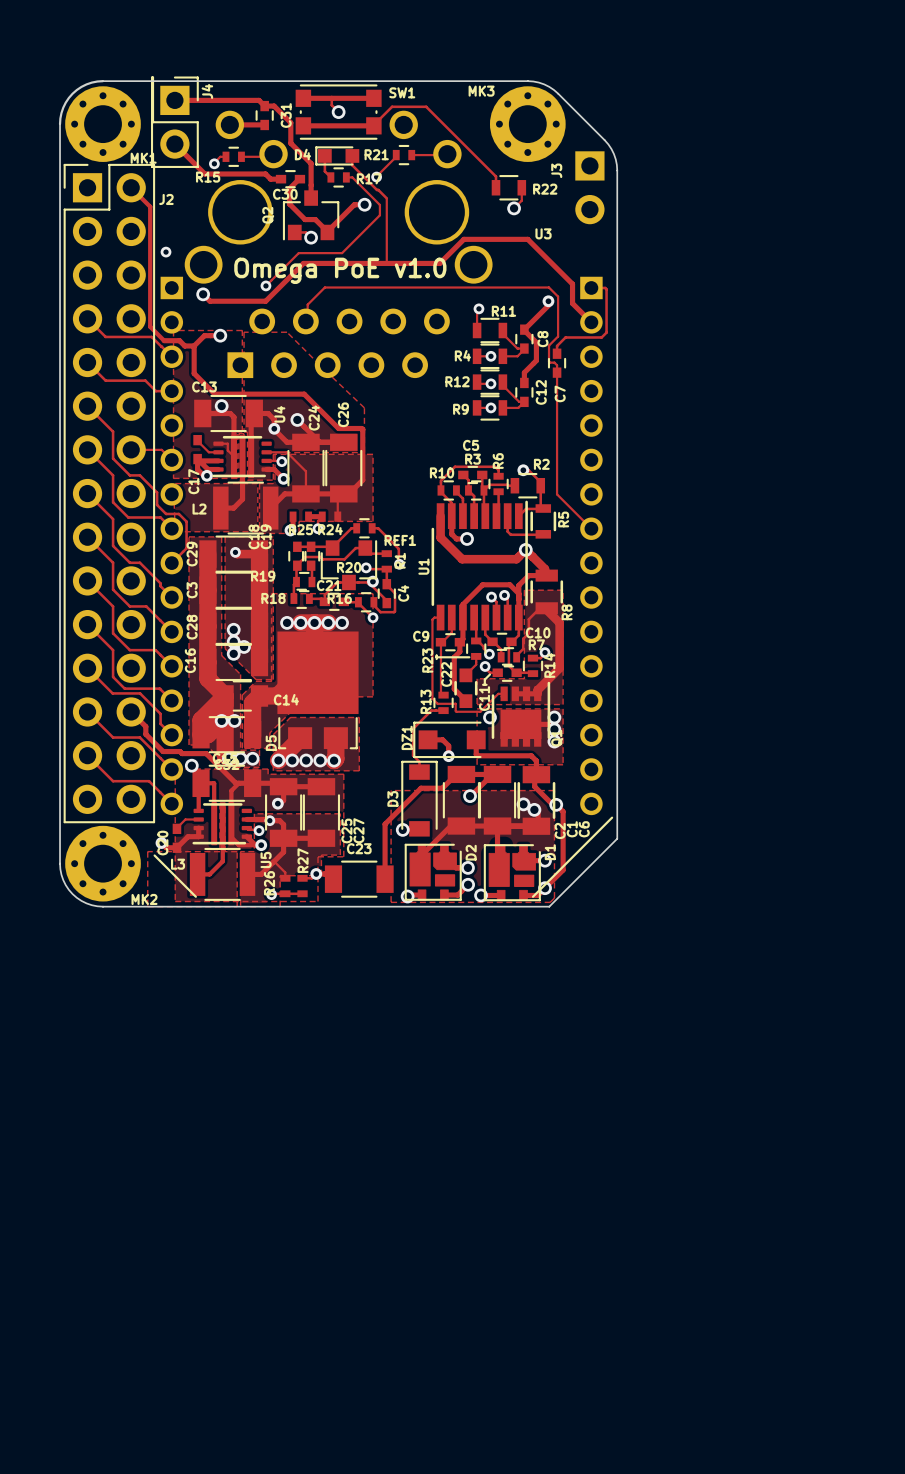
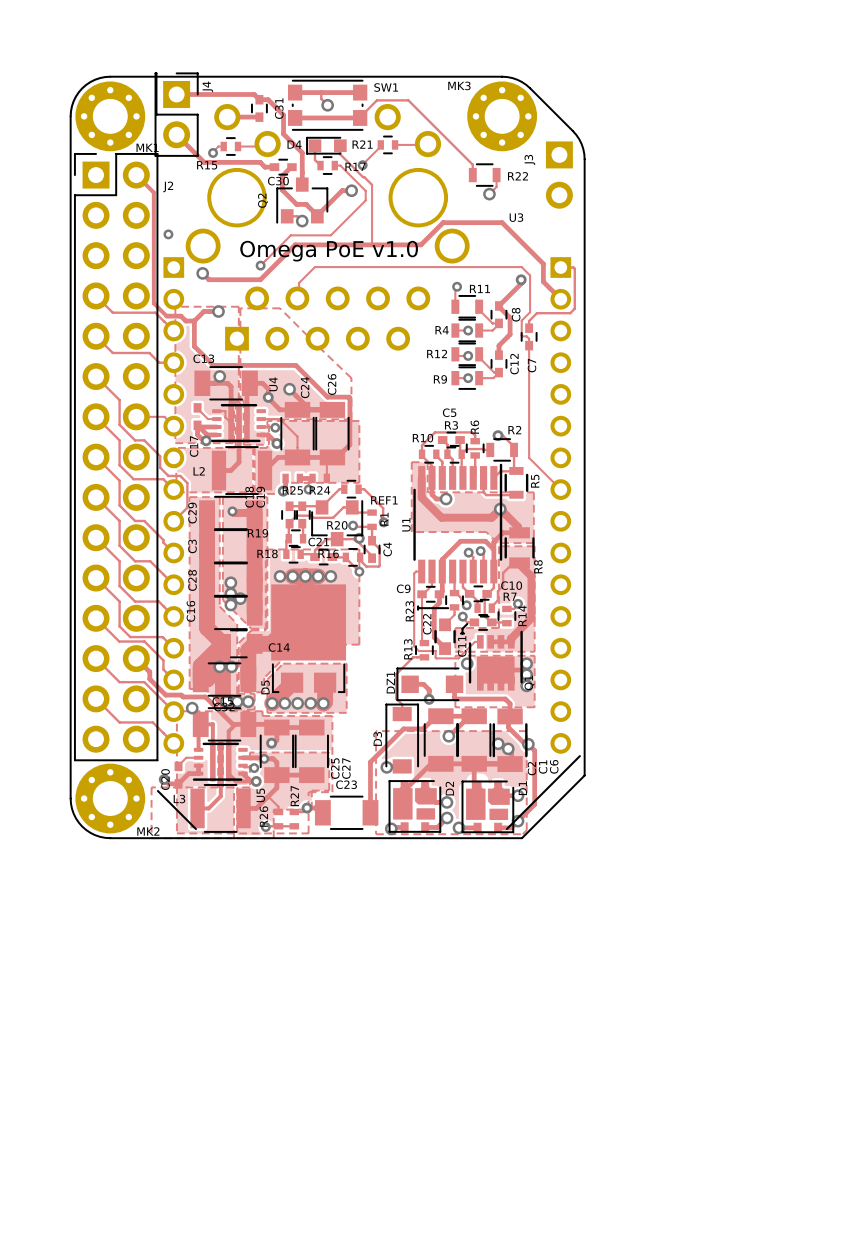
zone outline: none -> (411, 462) (427, 462) (427, 492) (533, 492) (533, 543) (497, 543) (486, 532) (411, 532) (411, 462)

